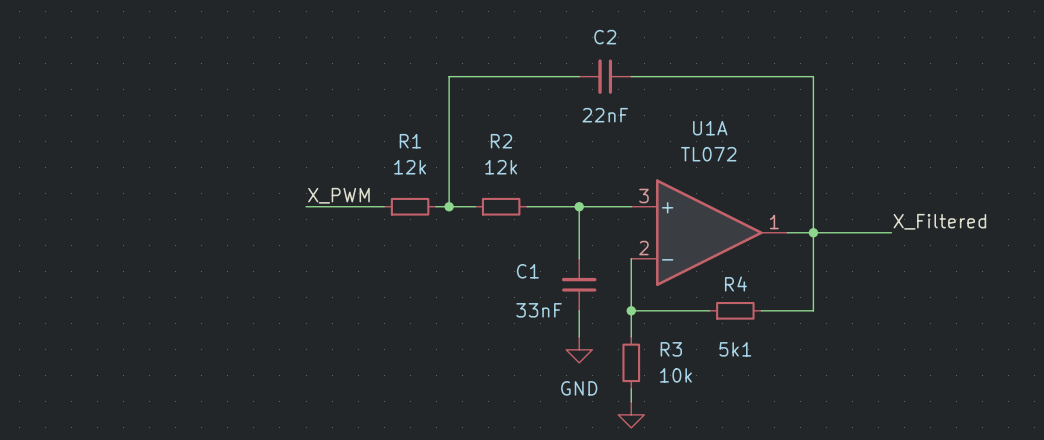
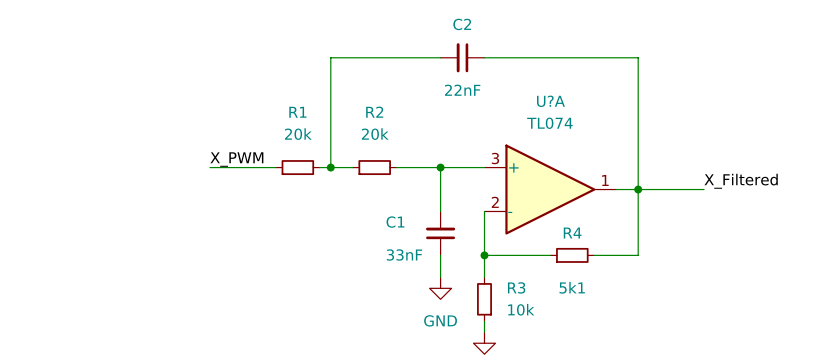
U1A name: U1A (710, 128) -> U?A (550, 101)
U1A value: TL072 (708, 154) -> TL074 (549, 123)
R1 value: 12k (410, 167) -> 20k (298, 134)
R2 value: 12k (501, 167) -> 20k (375, 134)

